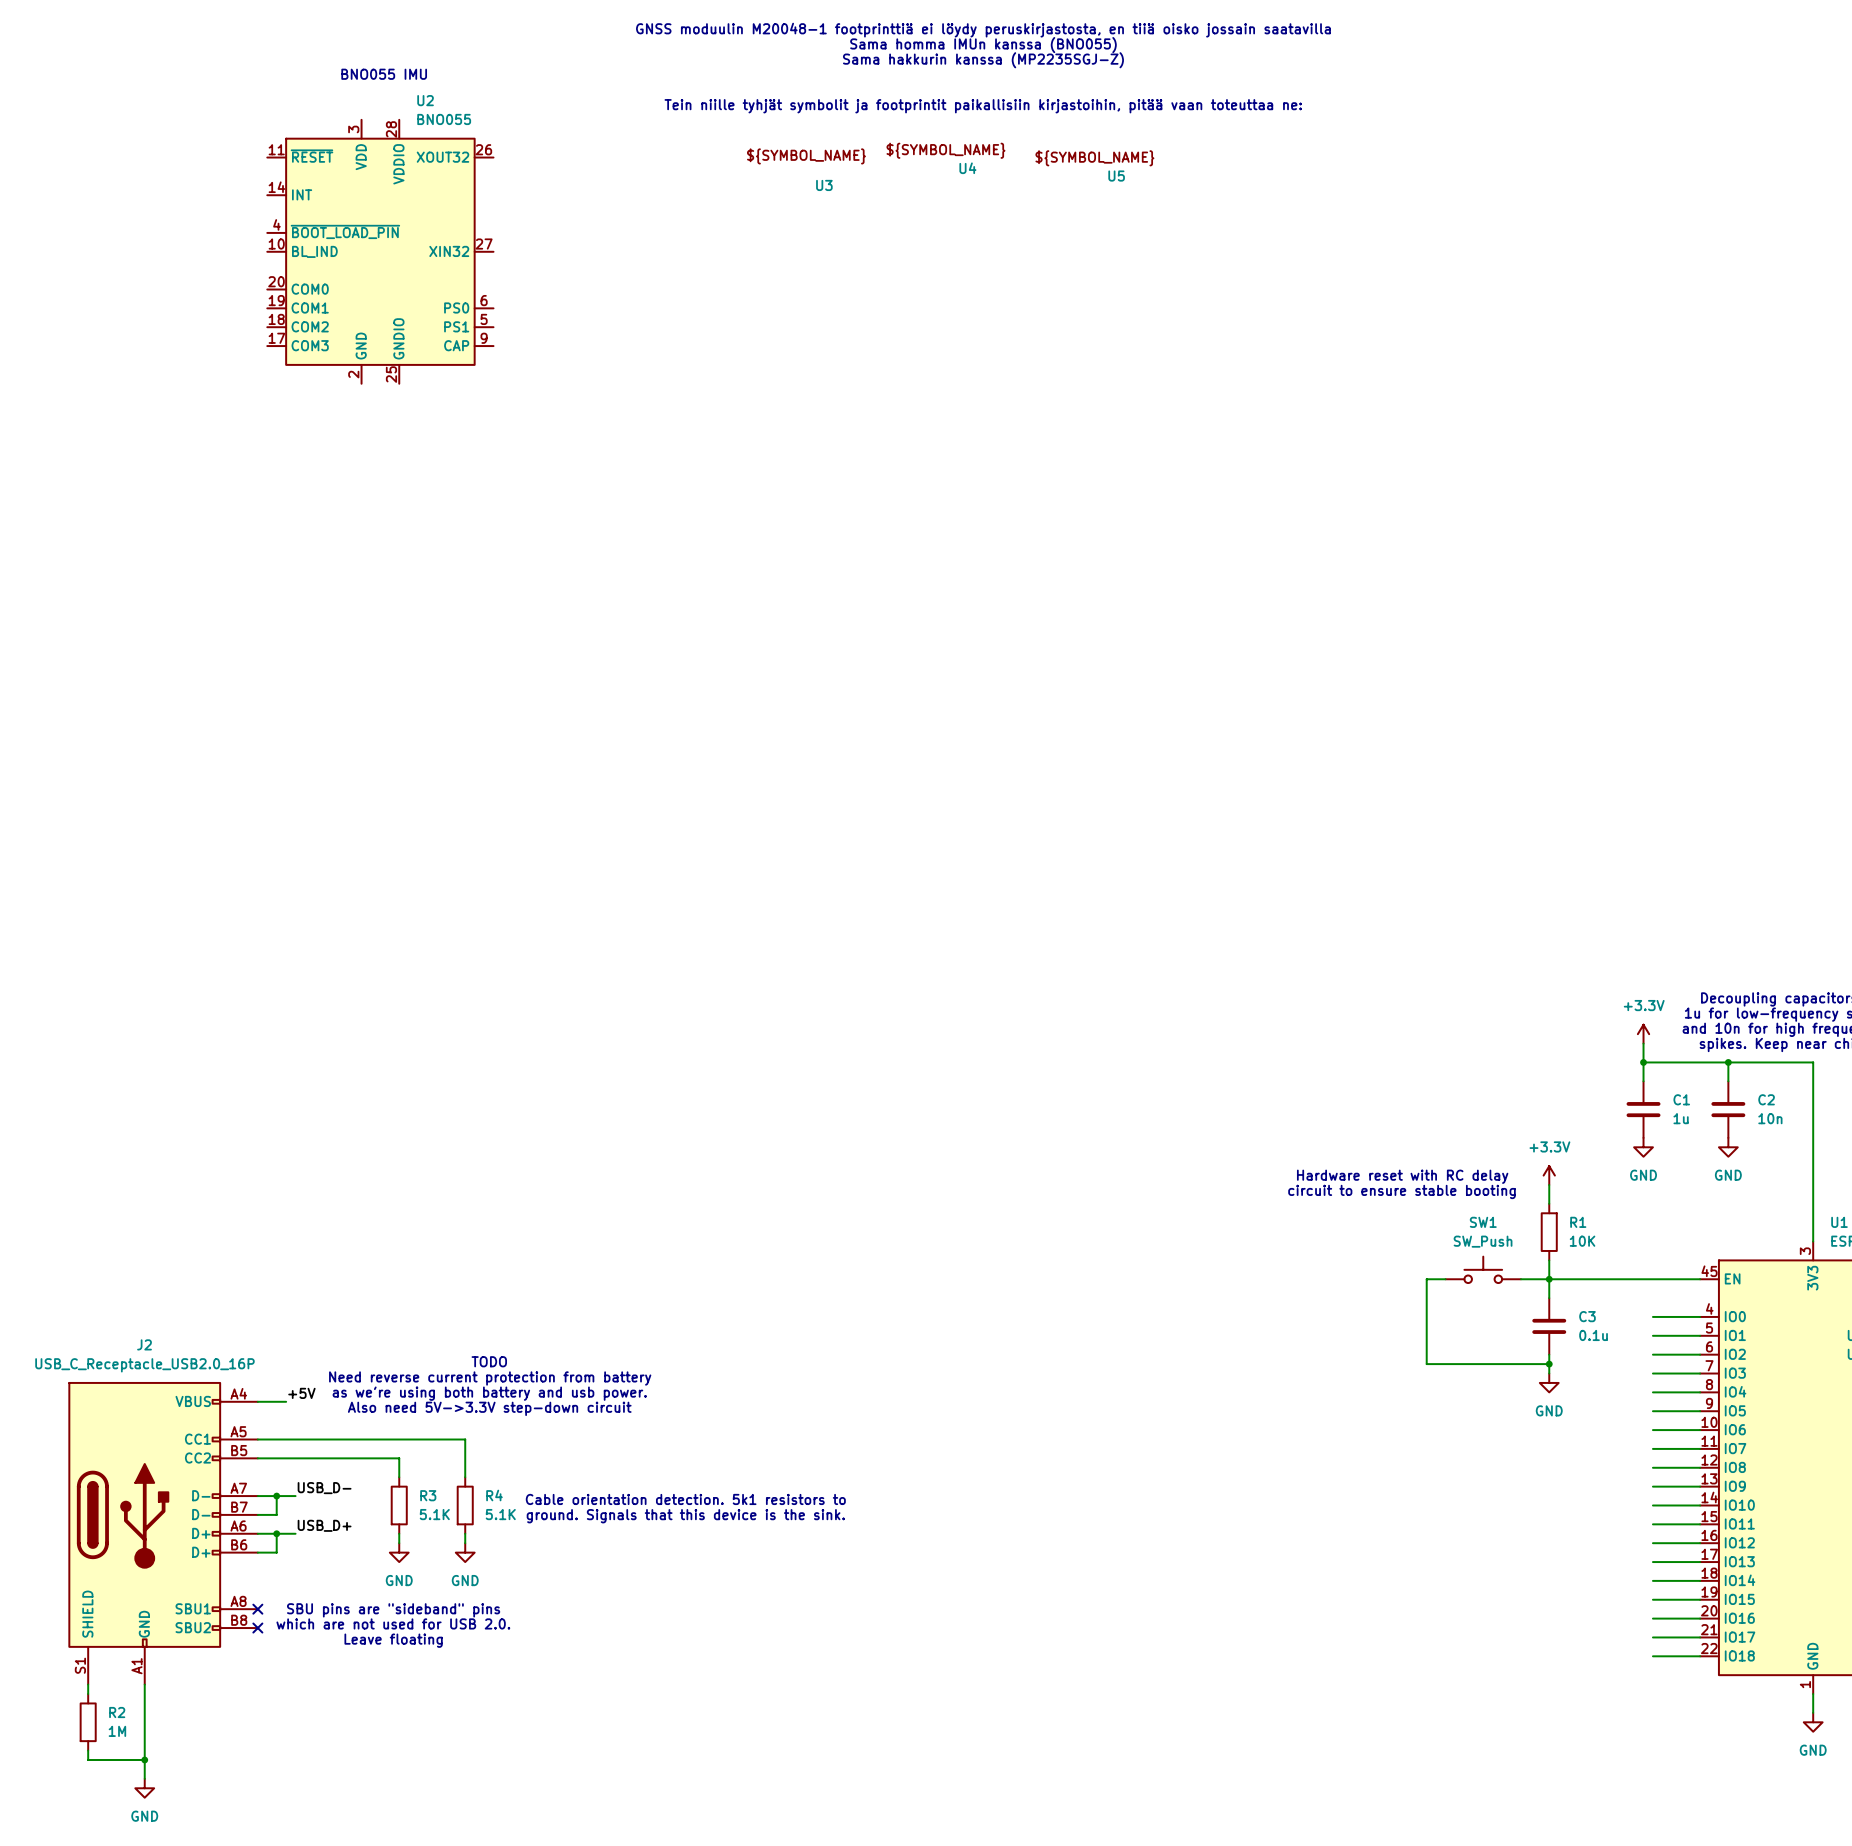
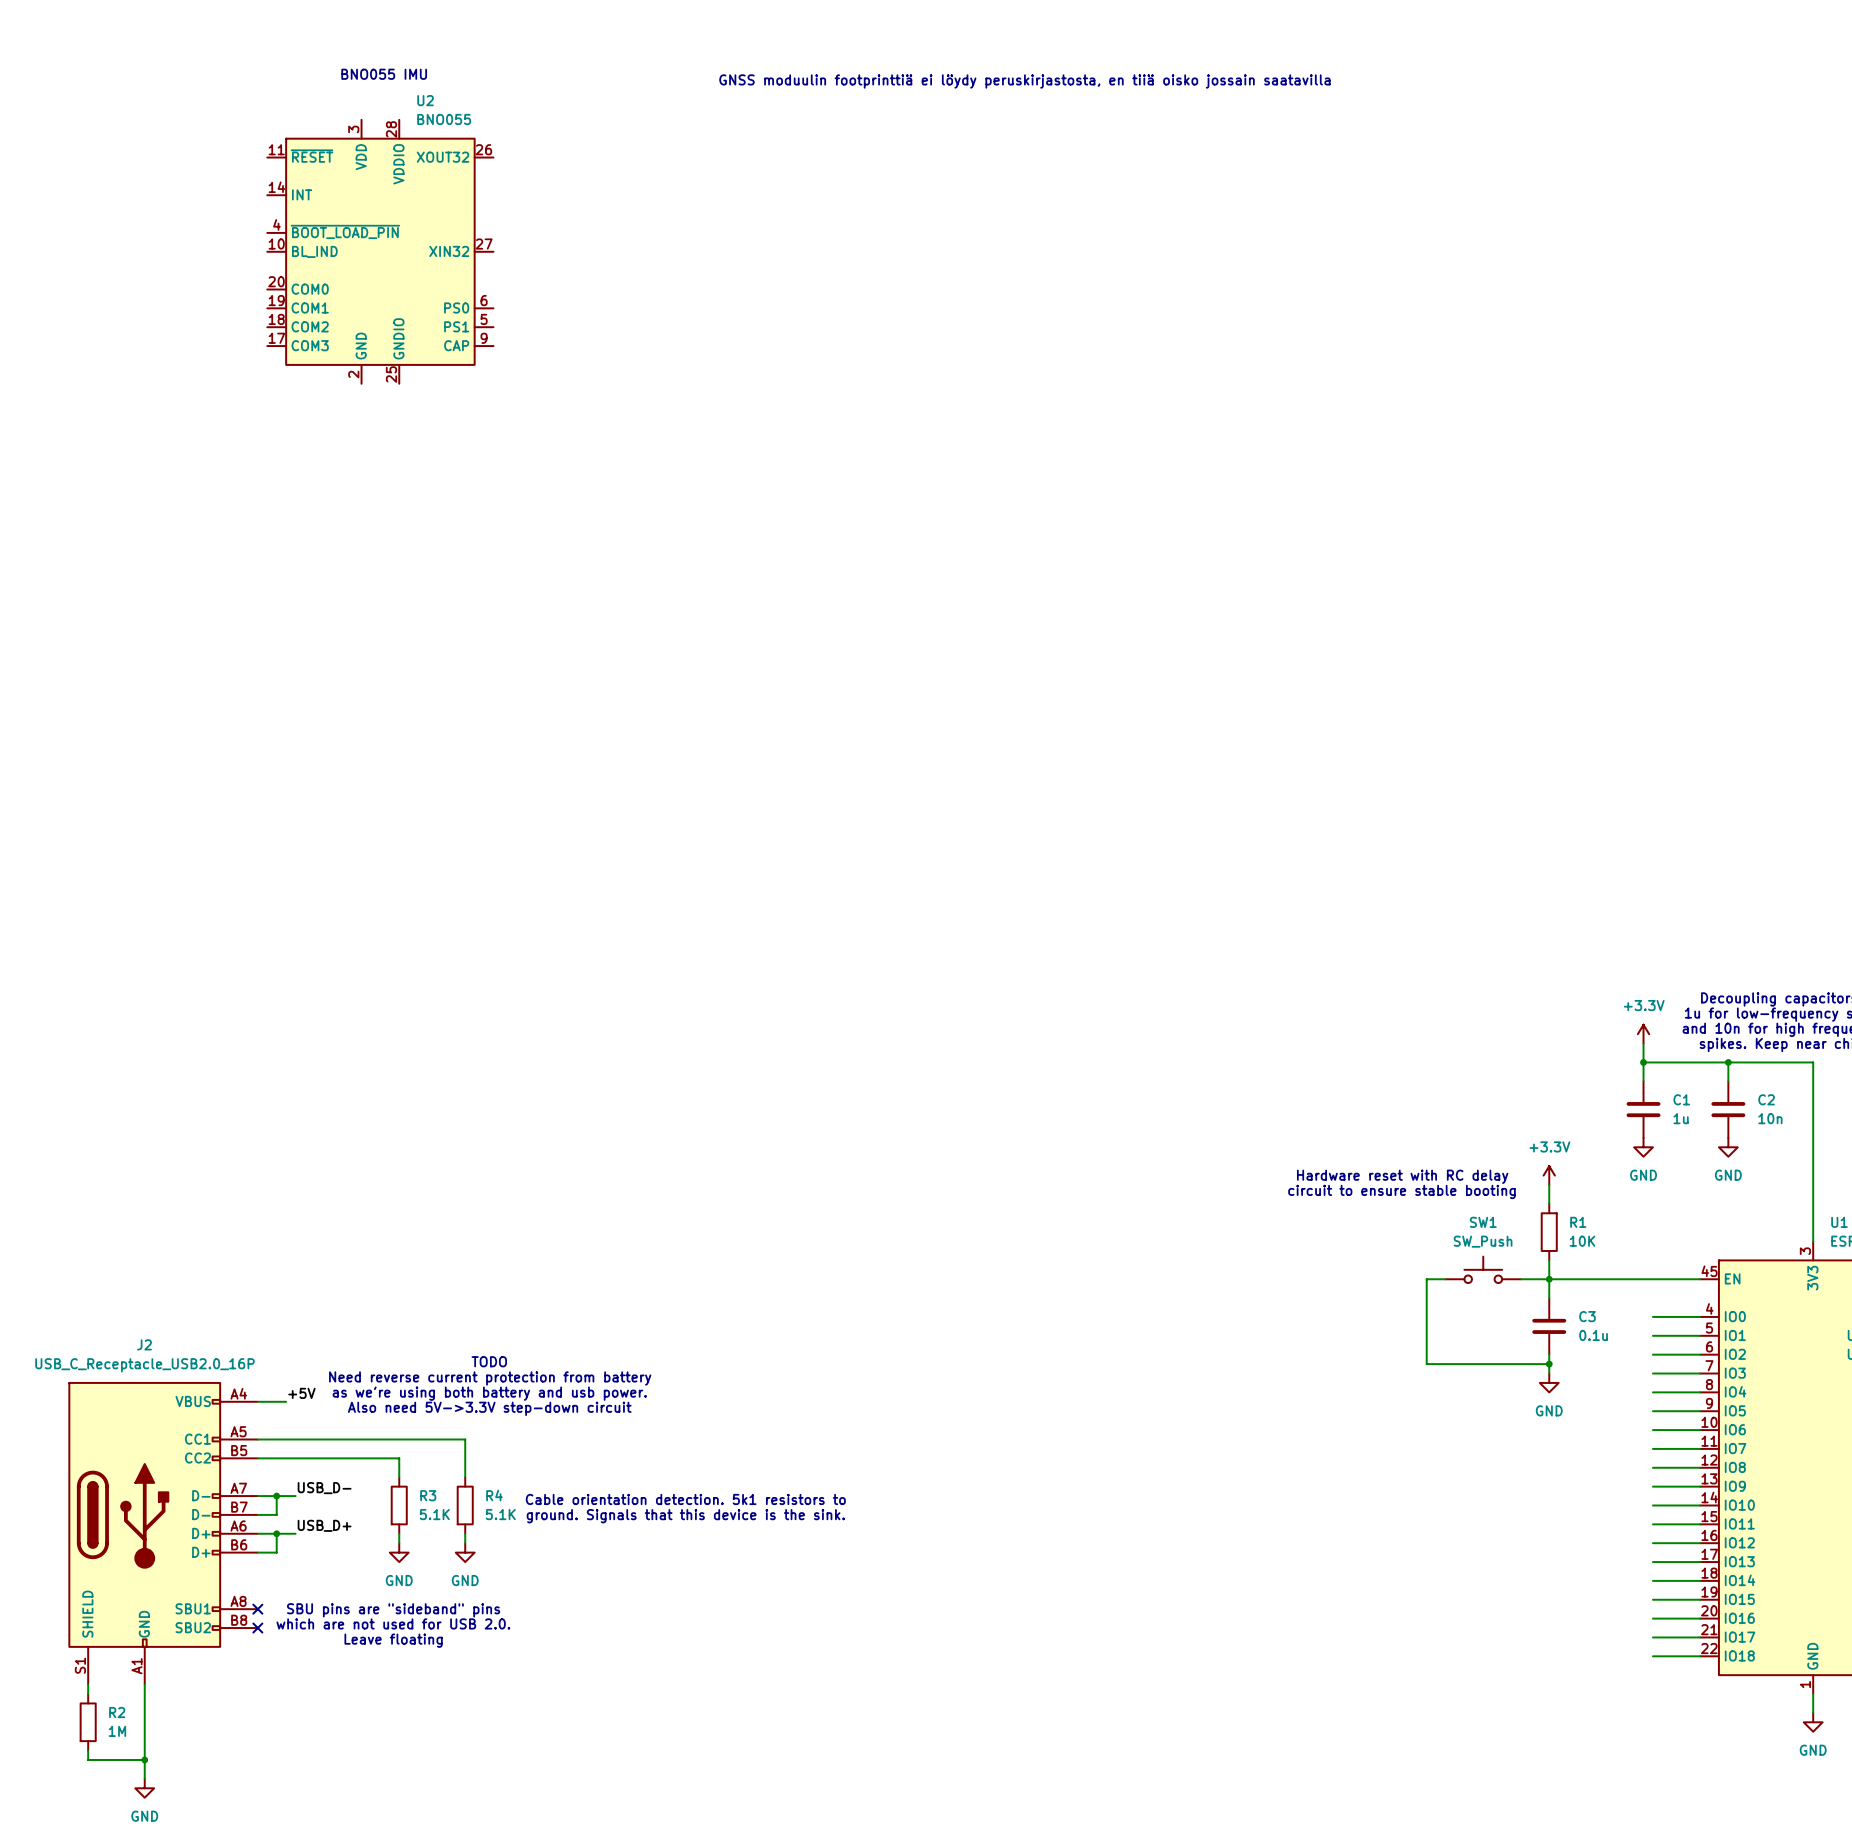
text: GNSS moduulin M20048-1 footprinttiä ei löydy peruskirjastosta, en tiiä oisko jossain saatavilla (983, 30) -> none
text: Sama homma IMUn kanssa (BNO055) (983, 45) -> none
text: Sama hakkurin kanssa (MP2235SGJ-Z) (983, 60) -> none
text: none -> GNSS moduulin footprinttiä ei löydy peruskirjastosta, en tiiä oisko jossain saatavilla (1024, 81)
text: Tein niille tyhjät symbolit ja footprintit paikallisiin kirjastoihin, pitää vaan toteuttaa ne: (983, 106) -> none
U4: (945, 158) -> none
U5: (1094, 165) -> none
U3: (806, 169) -> none

